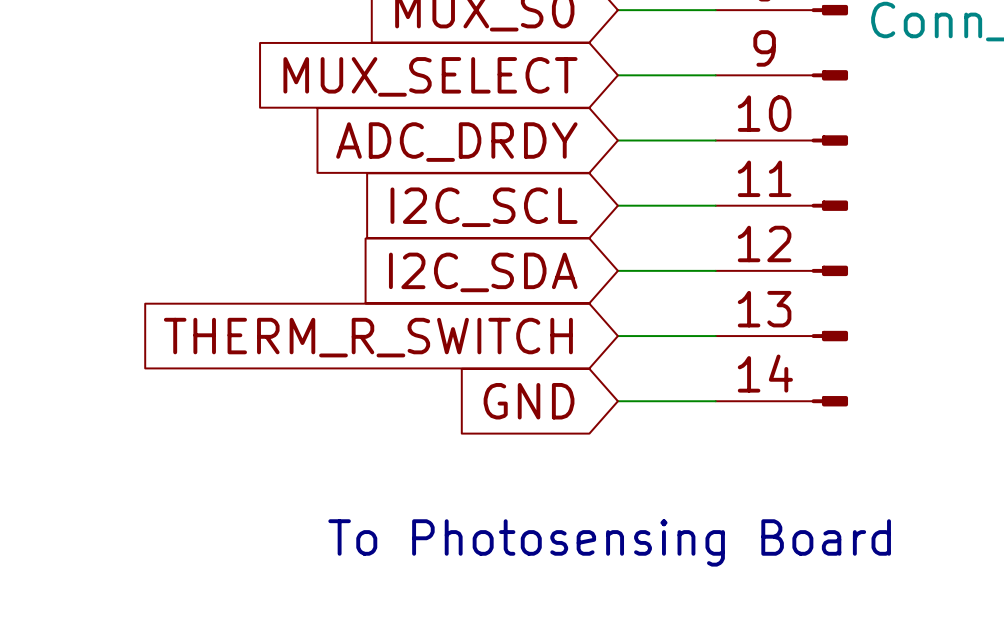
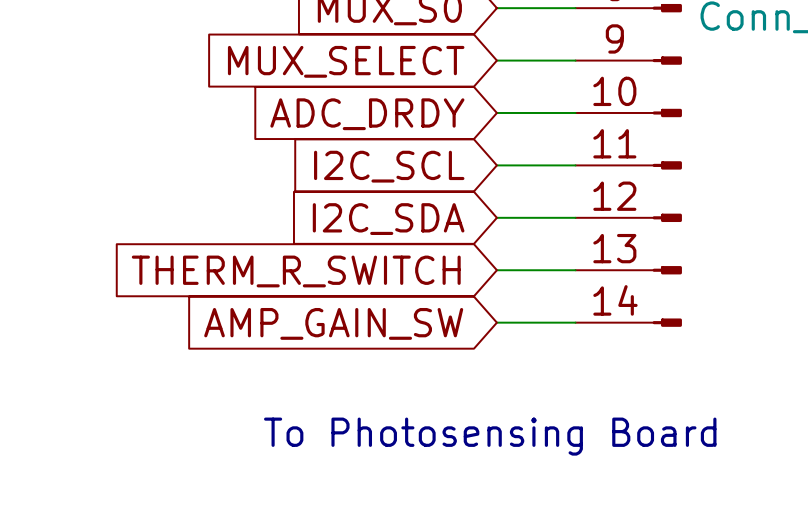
global label: GND (529, 401) -> AMP_GAIN_SW (333, 323)

